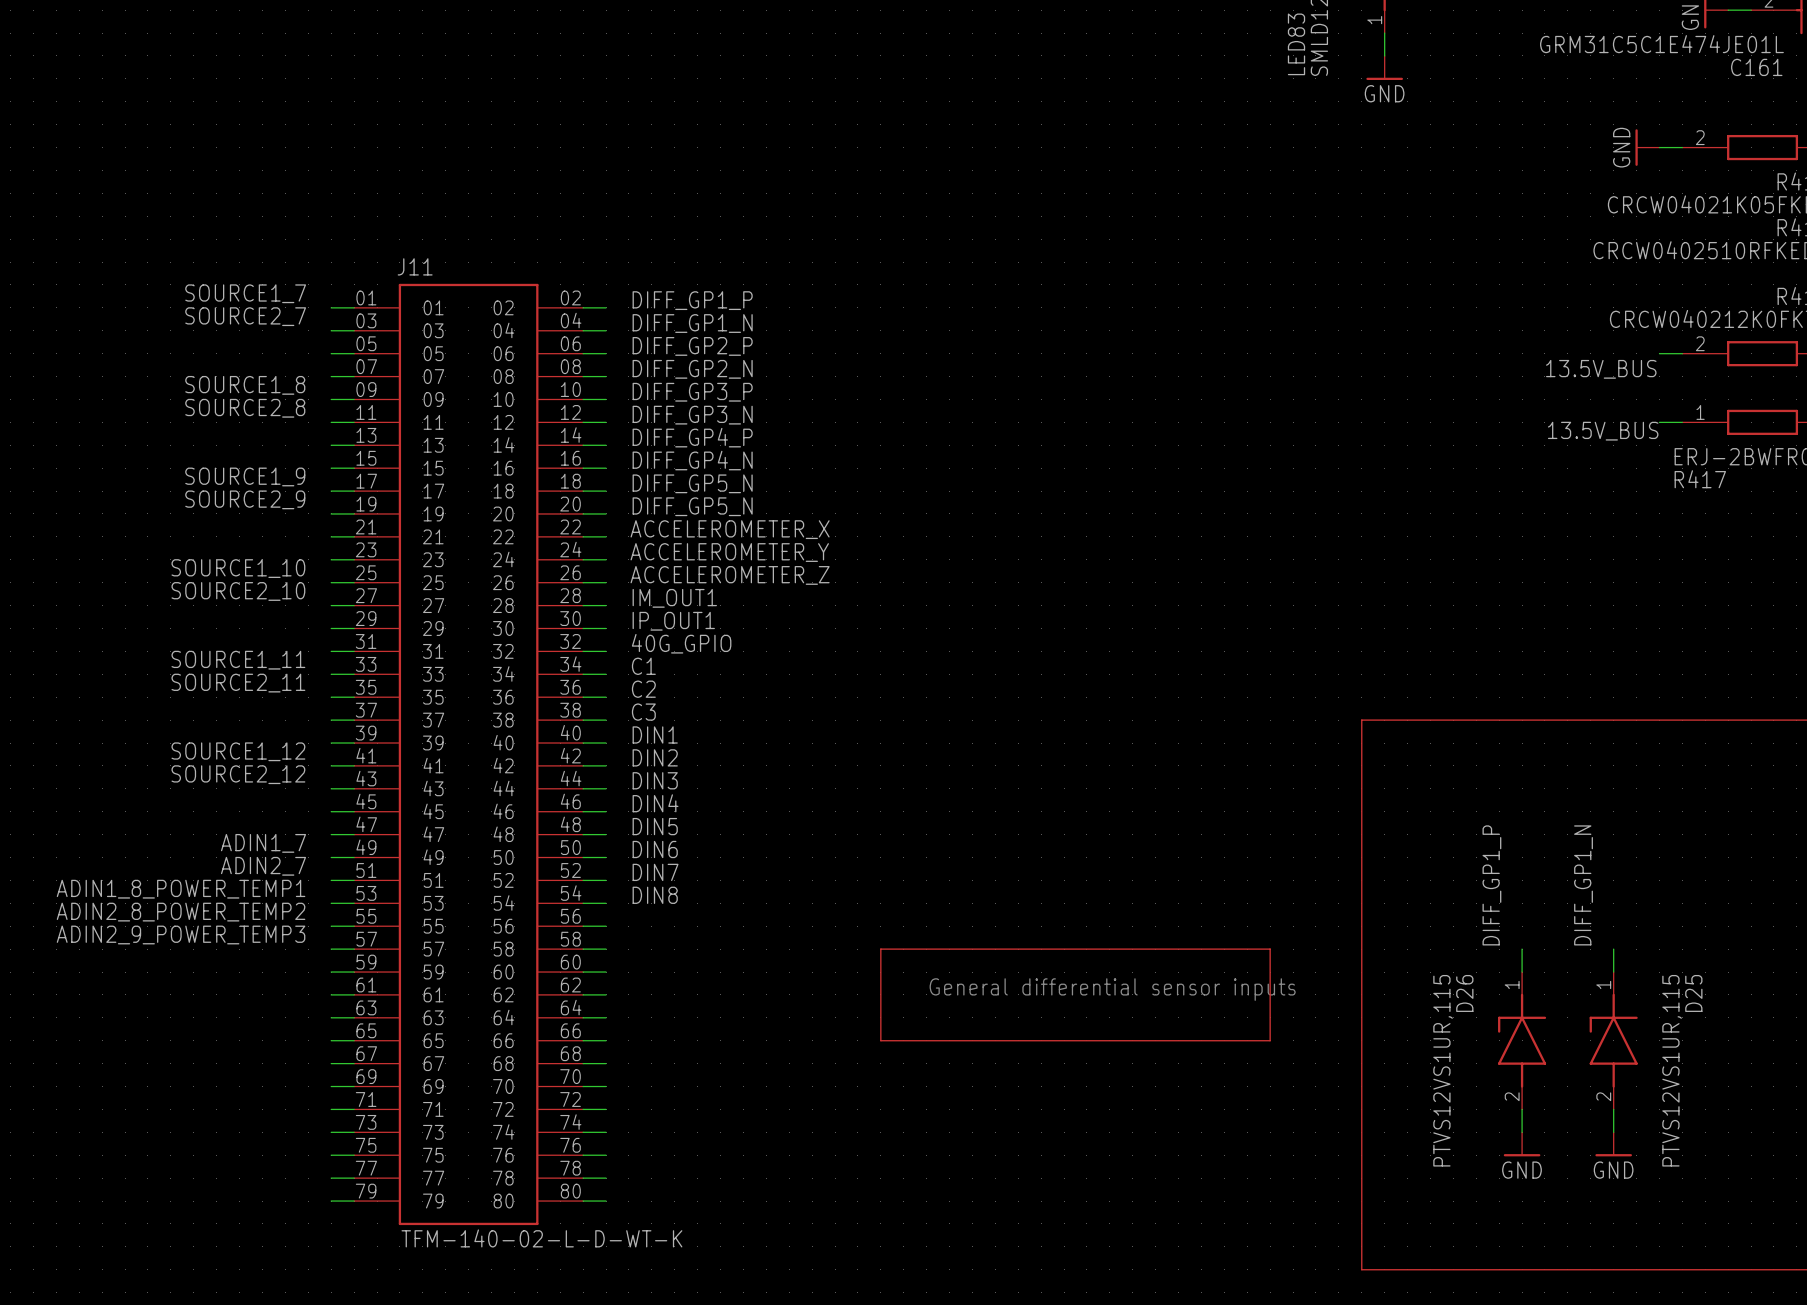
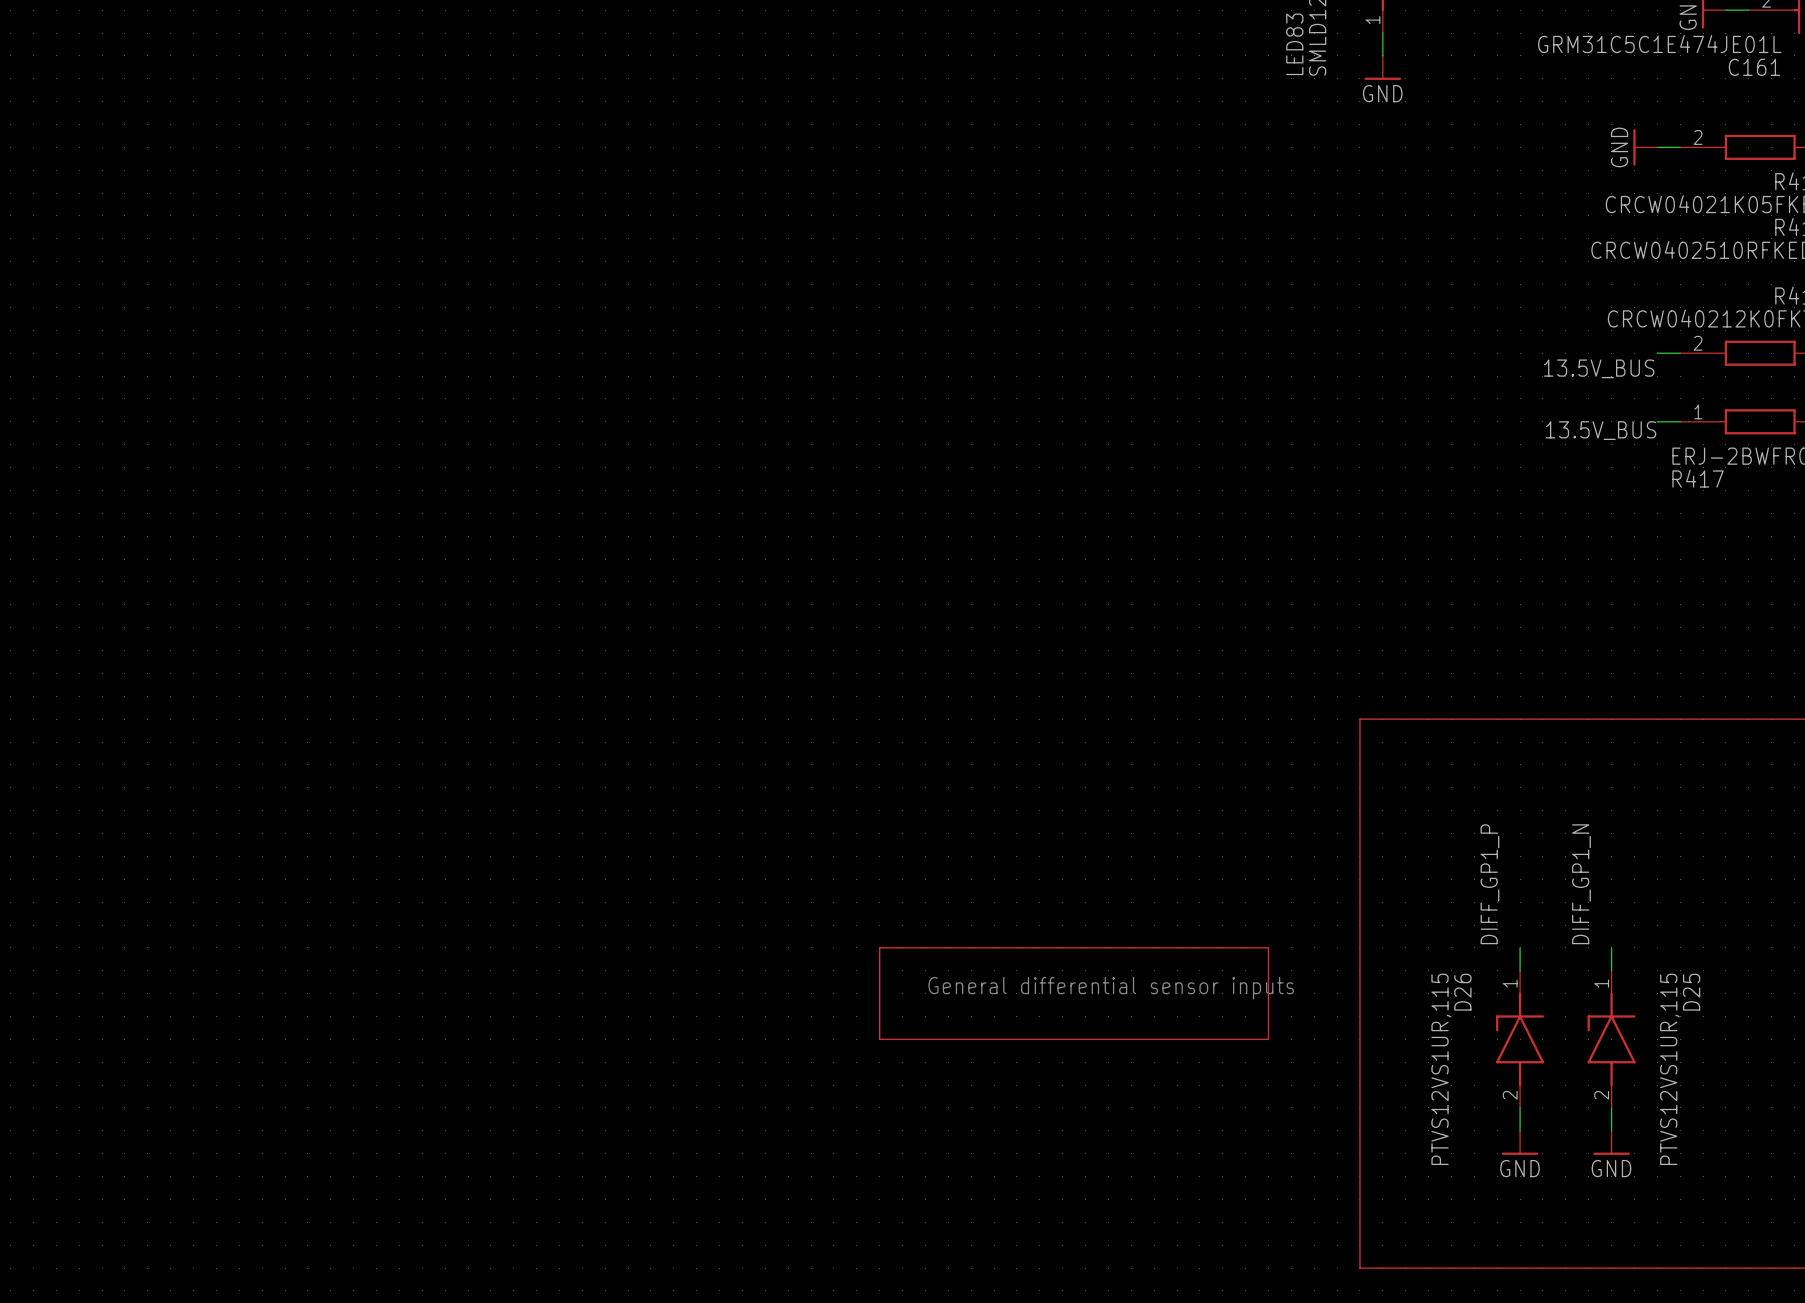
label: SOURCE1_7 (245, 293) -> none
label: DIFF_GP1_P (692, 300) -> none
wire: (331, 307) (354, 307) -> none
wire: (583, 307) (606, 307) -> none
label: SOURCE2_7 (245, 316) -> none
label: DIFF_GP1_N (692, 323) -> none
wire: (331, 330) (354, 330) -> none
wire: (583, 330) (606, 330) -> none
label: DIFF_GP2_P (692, 346) -> none
wire: (331, 353) (354, 353) -> none
wire: (583, 353) (606, 353) -> none
label: DIFF_GP2_N (692, 369) -> none
wire: (331, 376) (354, 376) -> none
wire: (583, 376) (606, 376) -> none
label: SOURCE1_8 (245, 385) -> none
label: DIFF_GP3_P (692, 392) -> none
wire: (331, 399) (354, 399) -> none
wire: (583, 399) (606, 399) -> none
label: SOURCE2_8 (245, 408) -> none
label: DIFF_GP3_N (692, 415) -> none
wire: (331, 422) (354, 422) -> none
wire: (583, 422) (606, 422) -> none
label: DIFF_GP4_P (692, 437) -> none
wire: (331, 445) (354, 445) -> none
wire: (583, 445) (606, 445) -> none
label: DIFF_GP4_N (692, 460) -> none
wire: (331, 468) (354, 468) -> none
wire: (583, 468) (606, 468) -> none
label: SOURCE1_9 (245, 476) -> none
label: DIFF_GP5_N (692, 483) -> none
wire: (331, 491) (354, 491) -> none
wire: (583, 491) (606, 491) -> none
label: SOURCE2_9 (245, 499) -> none
label: DIFF_GP5_N (692, 506) -> none
wire: (331, 513) (354, 513) -> none
wire: (583, 513) (606, 513) -> none
label: ACCELEROMETER_X (730, 529) -> none
wire: (331, 536) (354, 536) -> none
wire: (583, 536) (606, 536) -> none
label: ACCELEROMETER_Y (729, 552) -> none
wire: (331, 559) (354, 559) -> none
wire: (583, 559) (606, 559) -> none
label: SOURCE1_10 (238, 568) -> none
label: ACCELEROMETER_Z (730, 575) -> none
wire: (331, 582) (354, 582) -> none
wire: (583, 582) (606, 582) -> none
label: SOURCE2_10 (238, 591) -> none
label: IM_OUT1 (674, 598) -> none
wire: (331, 605) (354, 605) -> none
wire: (583, 605) (606, 605) -> none
label: IP_OUT1 (673, 621) -> none
wire: (331, 628) (354, 628) -> none
wire: (583, 628) (606, 628) -> none
label: 40G_GPIO (681, 643) -> none
wire: (331, 651) (354, 651) -> none
wire: (583, 651) (606, 651) -> none
label: SOURCE1_11 (238, 660) -> none
label: C1 (643, 666) -> none
wire: (331, 674) (354, 674) -> none
wire: (583, 674) (606, 674) -> none
label: SOURCE2_11 (238, 683) -> none
label: C2 (643, 689) -> none
wire: (331, 697) (354, 697) -> none
wire: (583, 697) (606, 697) -> none
label: C3 (643, 712) -> none
wire: (331, 720) (354, 720) -> none
wire: (583, 720) (606, 720) -> none
label: DIN1 (655, 734) -> none
wire: (331, 743) (354, 743) -> none
wire: (583, 743) (606, 743) -> none
label: SOURCE1_12 (238, 751) -> none
J11: TFM-140-02-L-D-WT-K (468, 754) -> none
label: DIN2 (655, 757) -> none
wire: (331, 765) (354, 765) -> none
wire: (583, 765) (606, 765) -> none
label: SOURCE2_12 (238, 774) -> none
label: DIN3 (655, 780) -> none
wire: (331, 788) (354, 788) -> none
wire: (583, 788) (606, 788) -> none
label: DIN4 (655, 803) -> none
wire: (331, 811) (354, 811) -> none
wire: (583, 811) (606, 811) -> none
label: DIN5 (655, 826) -> none
wire: (331, 834) (354, 834) -> none
wire: (583, 834) (606, 834) -> none
label: ADIN1_7 (263, 843) -> none
label: DIN6 (655, 849) -> none
wire: (331, 857) (354, 857) -> none
wire: (583, 857) (606, 857) -> none
label: ADIN2_7 (263, 866) -> none
label: DIN7 (655, 872) -> none
wire: (331, 880) (354, 880) -> none
wire: (583, 880) (606, 880) -> none
label: ADIN1_8_POWER_TEMP1 (181, 889) -> none
label: DIN8 (655, 895) -> none
wire: (331, 903) (354, 903) -> none
wire: (583, 903) (606, 903) -> none
label: ADIN2_8_POWER_TEMP2 (181, 912) -> none
wire: (331, 926) (354, 926) -> none
wire: (583, 926) (606, 926) -> none
label: ADIN2_9_POWER_TEMP3 (181, 934) -> none
wire: (331, 949) (354, 949) -> none
wire: (583, 949) (606, 949) -> none
wire: (331, 972) (354, 972) -> none
wire: (583, 972) (606, 972) -> none
wire: (331, 994) (354, 994) -> none
wire: (583, 994) (606, 994) -> none
wire: (331, 1017) (354, 1017) -> none
wire: (583, 1017) (606, 1017) -> none
wire: (331, 1040) (354, 1040) -> none
wire: (583, 1040) (606, 1040) -> none
wire: (331, 1063) (354, 1063) -> none
wire: (583, 1063) (606, 1063) -> none
wire: (331, 1086) (354, 1086) -> none
wire: (583, 1086) (606, 1086) -> none
wire: (331, 1109) (354, 1109) -> none
wire: (583, 1109) (606, 1109) -> none
wire: (331, 1132) (354, 1132) -> none
wire: (583, 1132) (606, 1132) -> none
wire: (331, 1155) (354, 1155) -> none
wire: (583, 1155) (606, 1155) -> none
wire: (331, 1178) (354, 1178) -> none
wire: (583, 1178) (606, 1178) -> none
wire: (331, 1201) (354, 1201) -> none
wire: (583, 1201) (606, 1201) -> none

